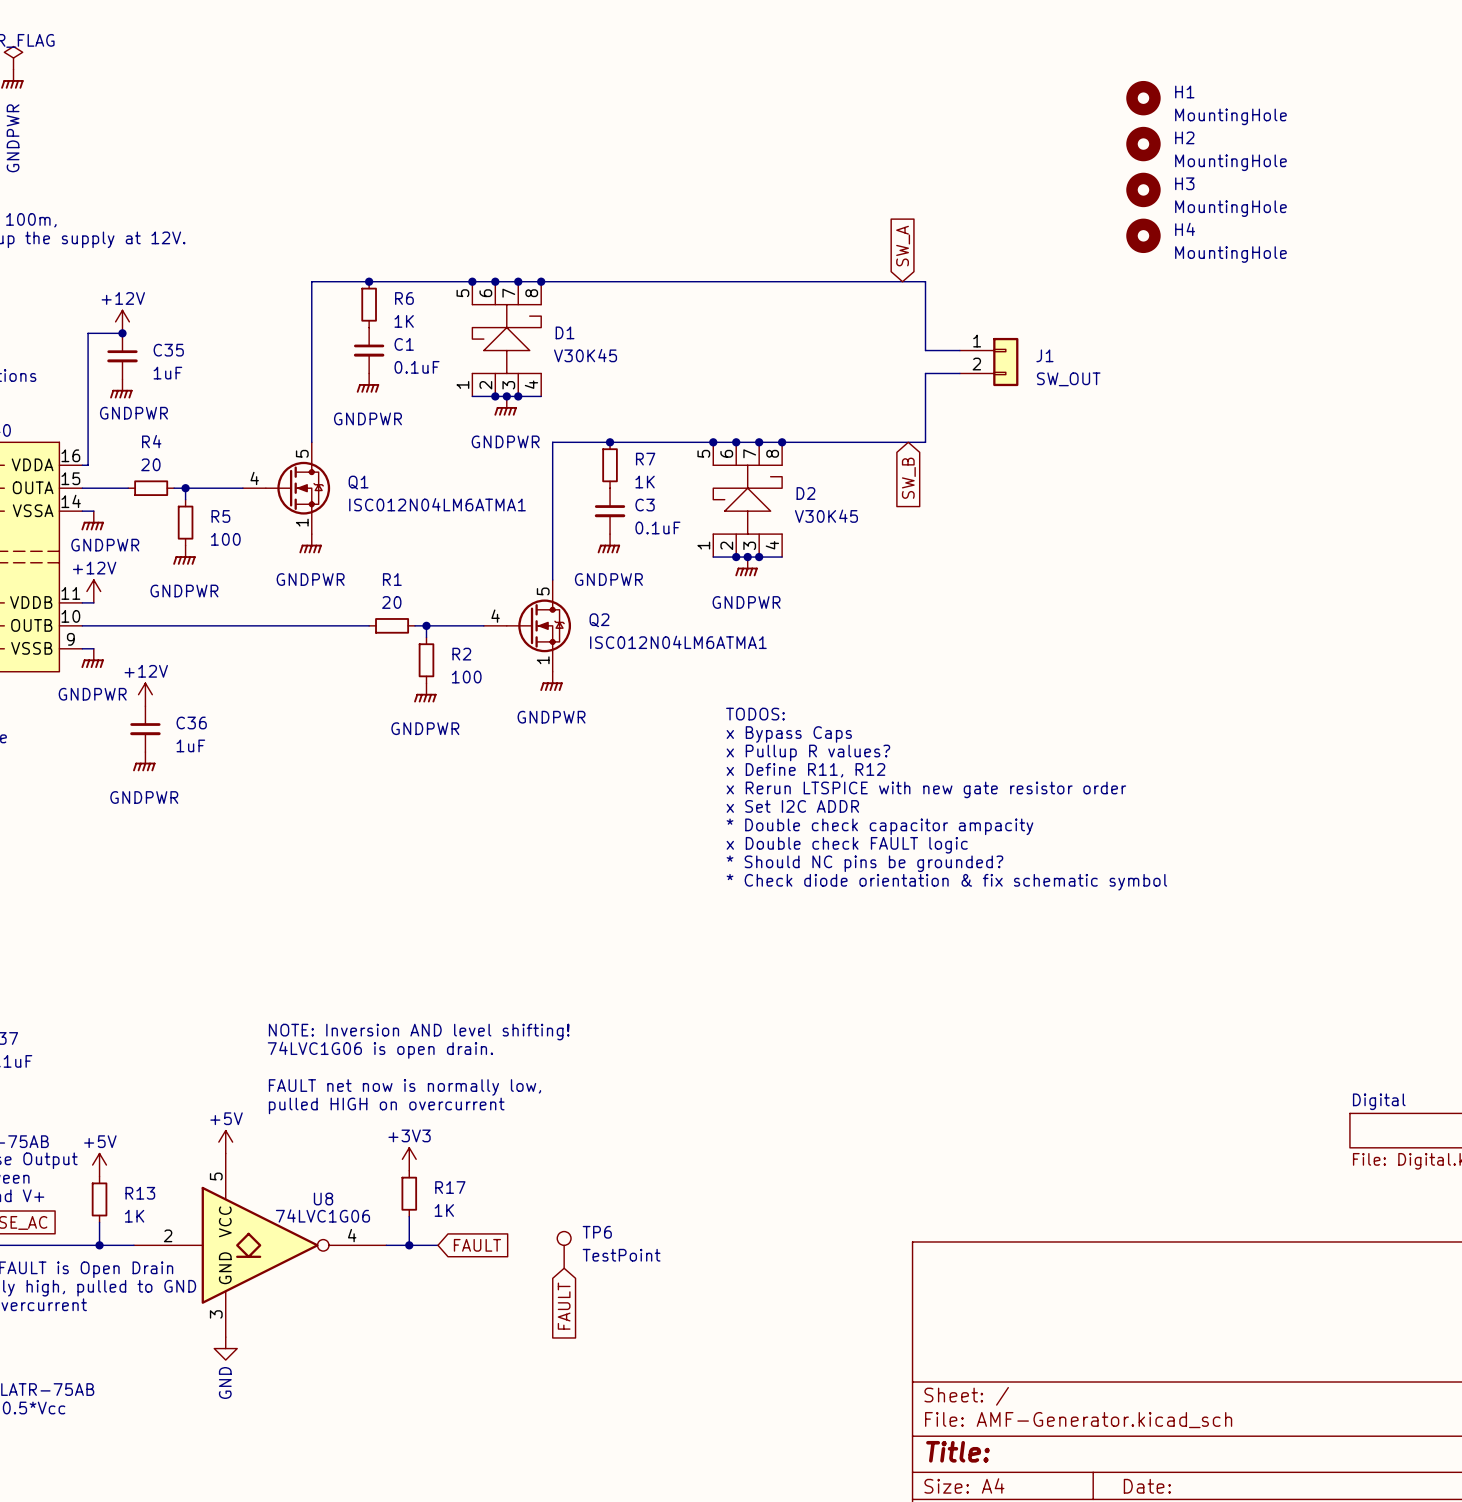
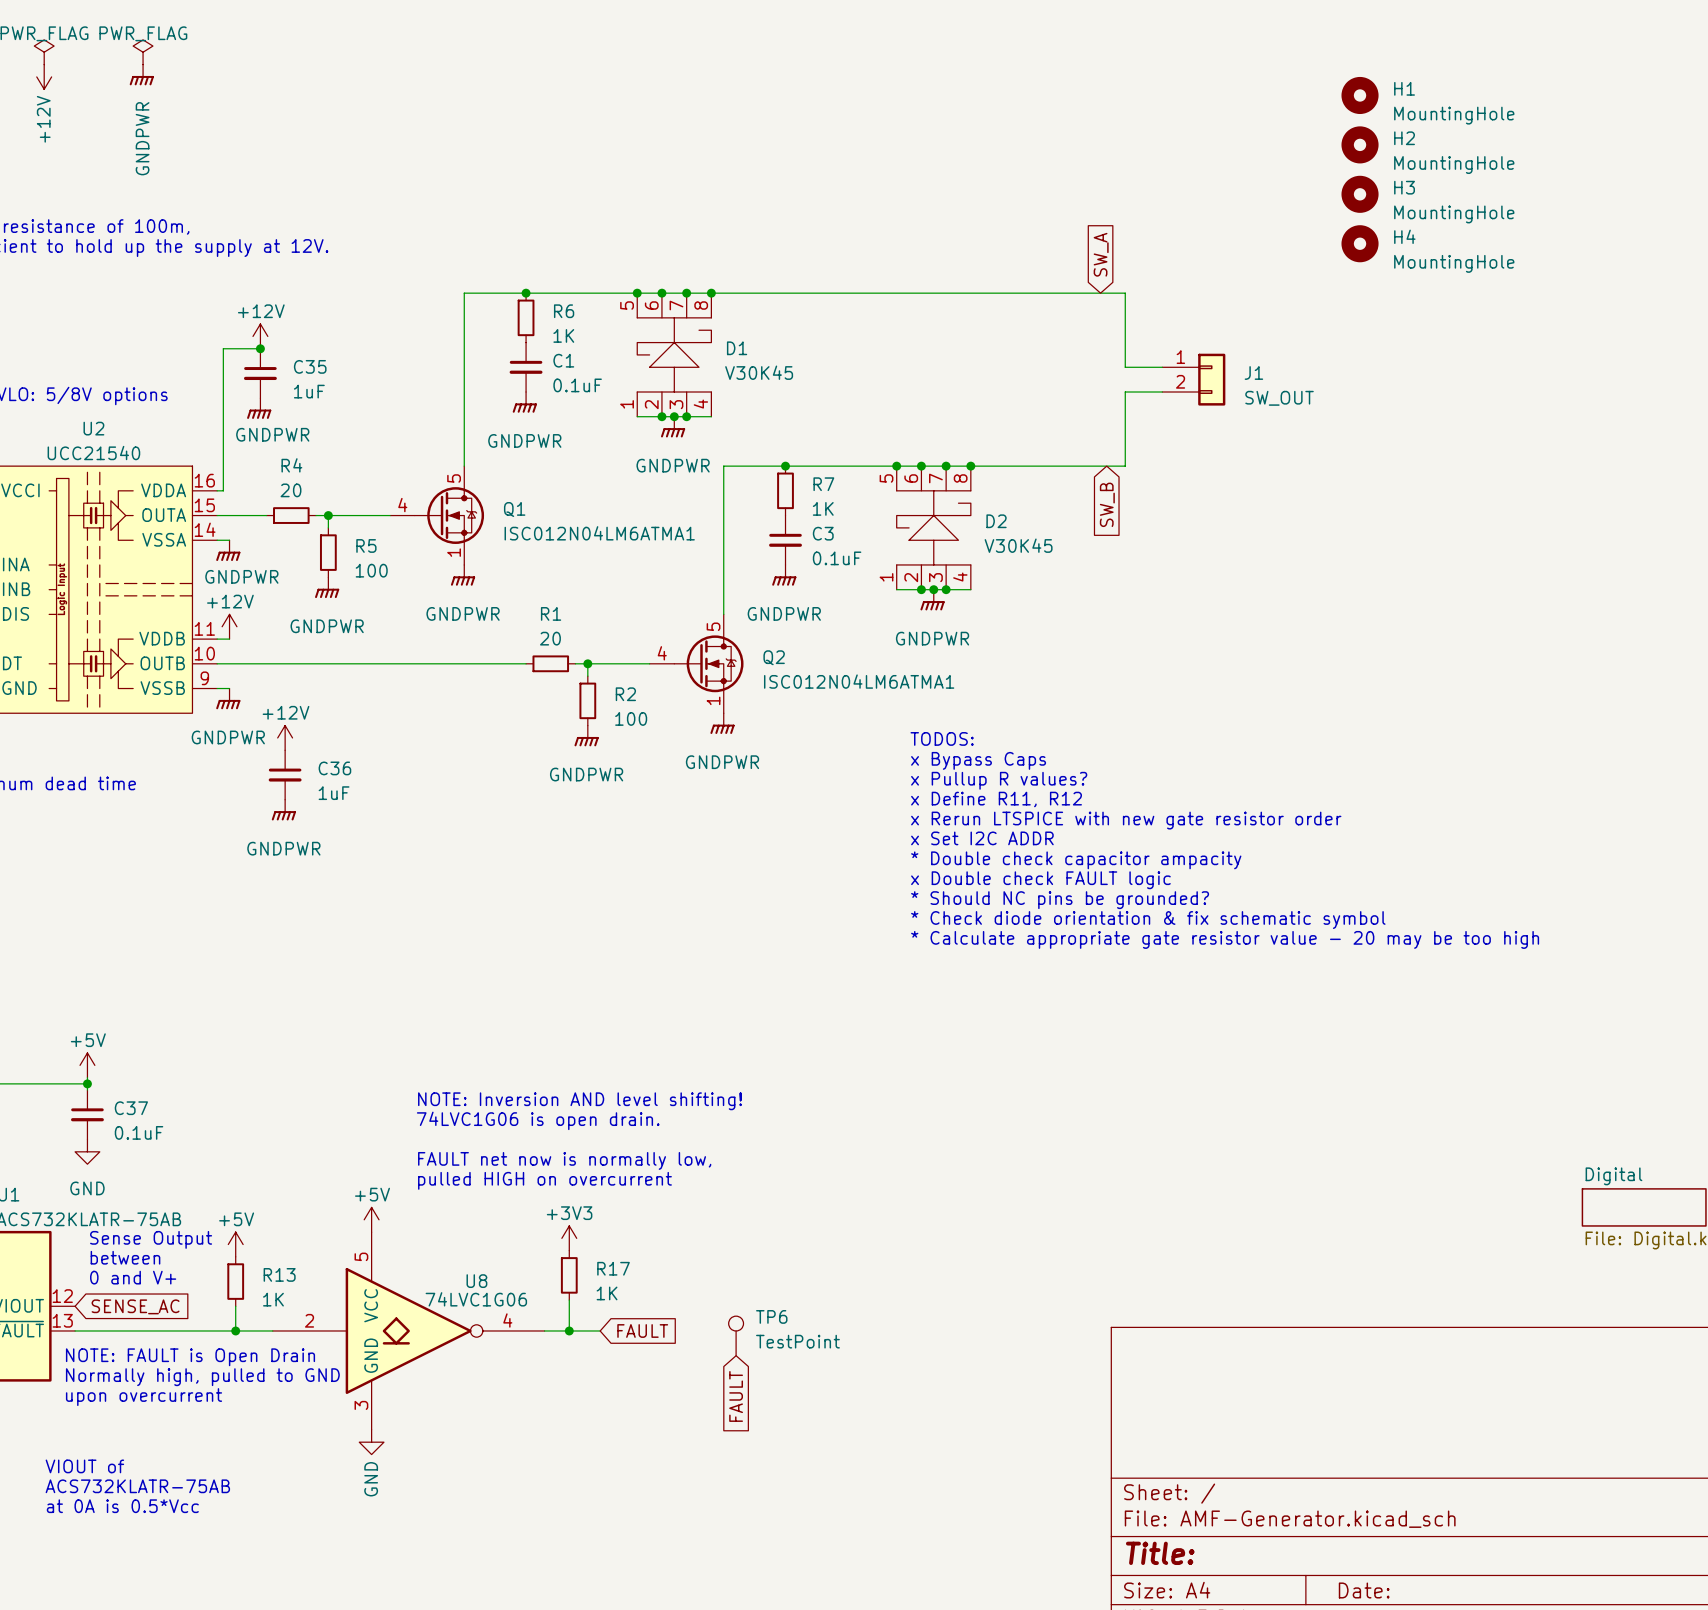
text: none -> TODOS: (942, 738)
text: TODOS: (755, 714) -> x Bypass Caps (978, 760)
text: x Bypass Caps (789, 734) -> x Pullup R values? (999, 780)
text: x Pullup R values? (808, 752) -> x Define R11, R12 (996, 799)
text: x Define R11, R12 (805, 770) -> x Rerun LTSPICE with new gate resistor order (1126, 820)
text: x Rerun LTSPICE with new gate resistor order (926, 789) -> x Set I2C ADDR (982, 838)
text: x Set I2C ADDR (792, 806) -> * Double check capacitor ampacity (1076, 860)
text: * Double check capacitor ampacity (879, 826) -> x Double check FAULT logic (1040, 880)
text: x Double check FAULT logic (847, 845) -> * Should NC pins be grounded? (1060, 900)
text: * Should NC pins be grounded? (864, 863) -> * Check diode orientation & fix schematic symbol (1148, 920)
text: * Check diode orientation & fix schematic symbol (946, 882) -> * Calculate appropriate gate resistor value - 20 may be too high (1225, 939)

